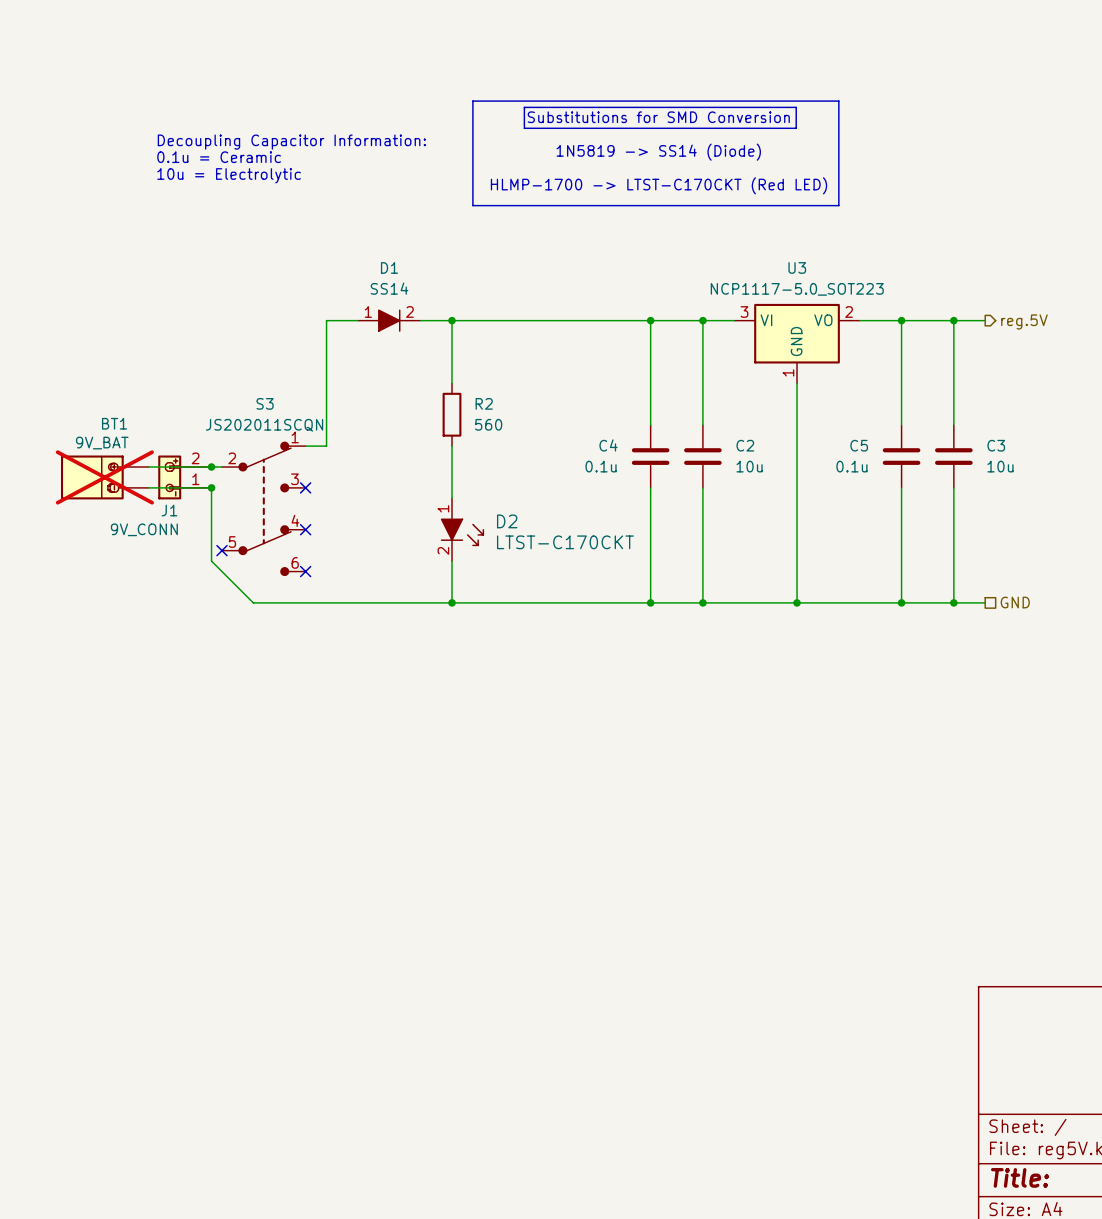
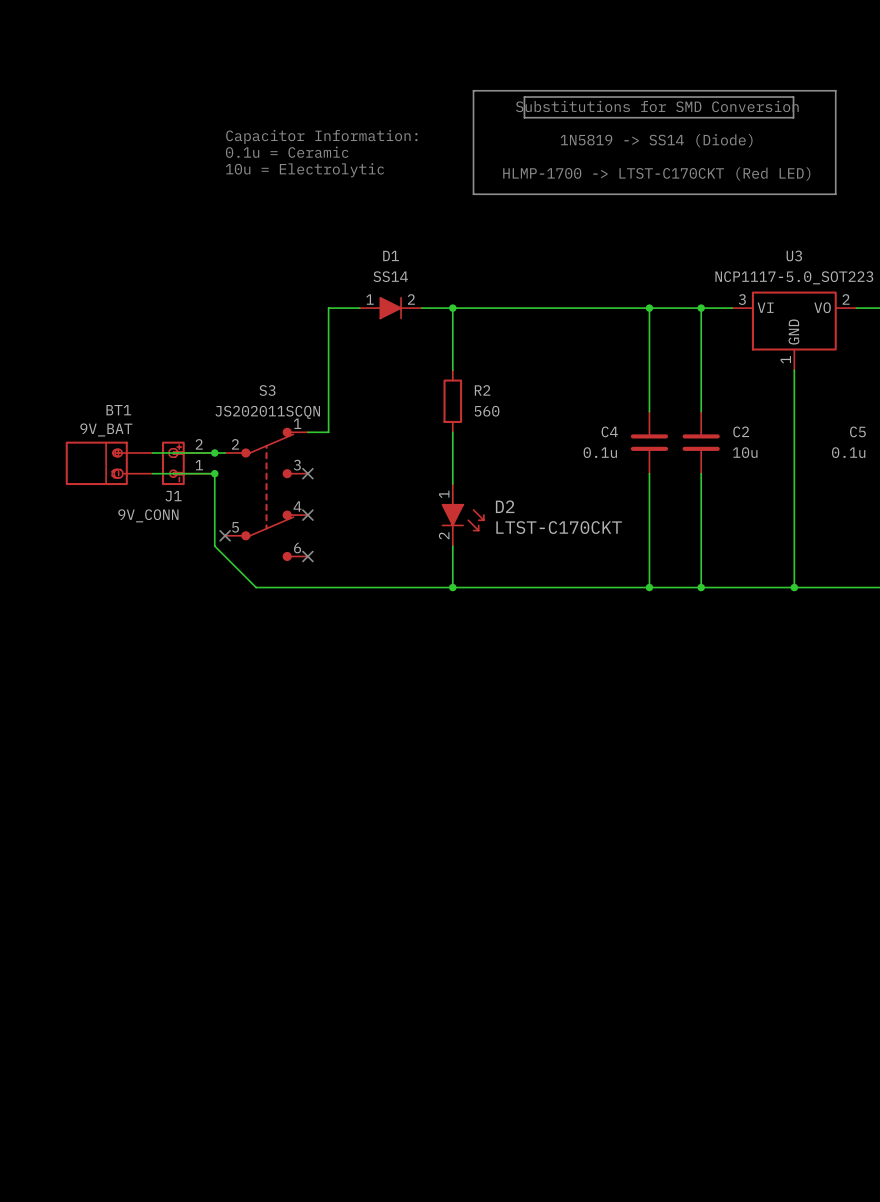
text: Decoupling Capacitor Information: (291, 142) -> Capacitor Information: (321, 136)
text position: 0.1u = Ceramic (219, 157) -> 0.1u = Ceramic (287, 152)
text position: 10u = Electrolytic (229, 175) -> 10u = Electrolytic (304, 170)
BT1 do-not-place cross: (104, 477) -> none

